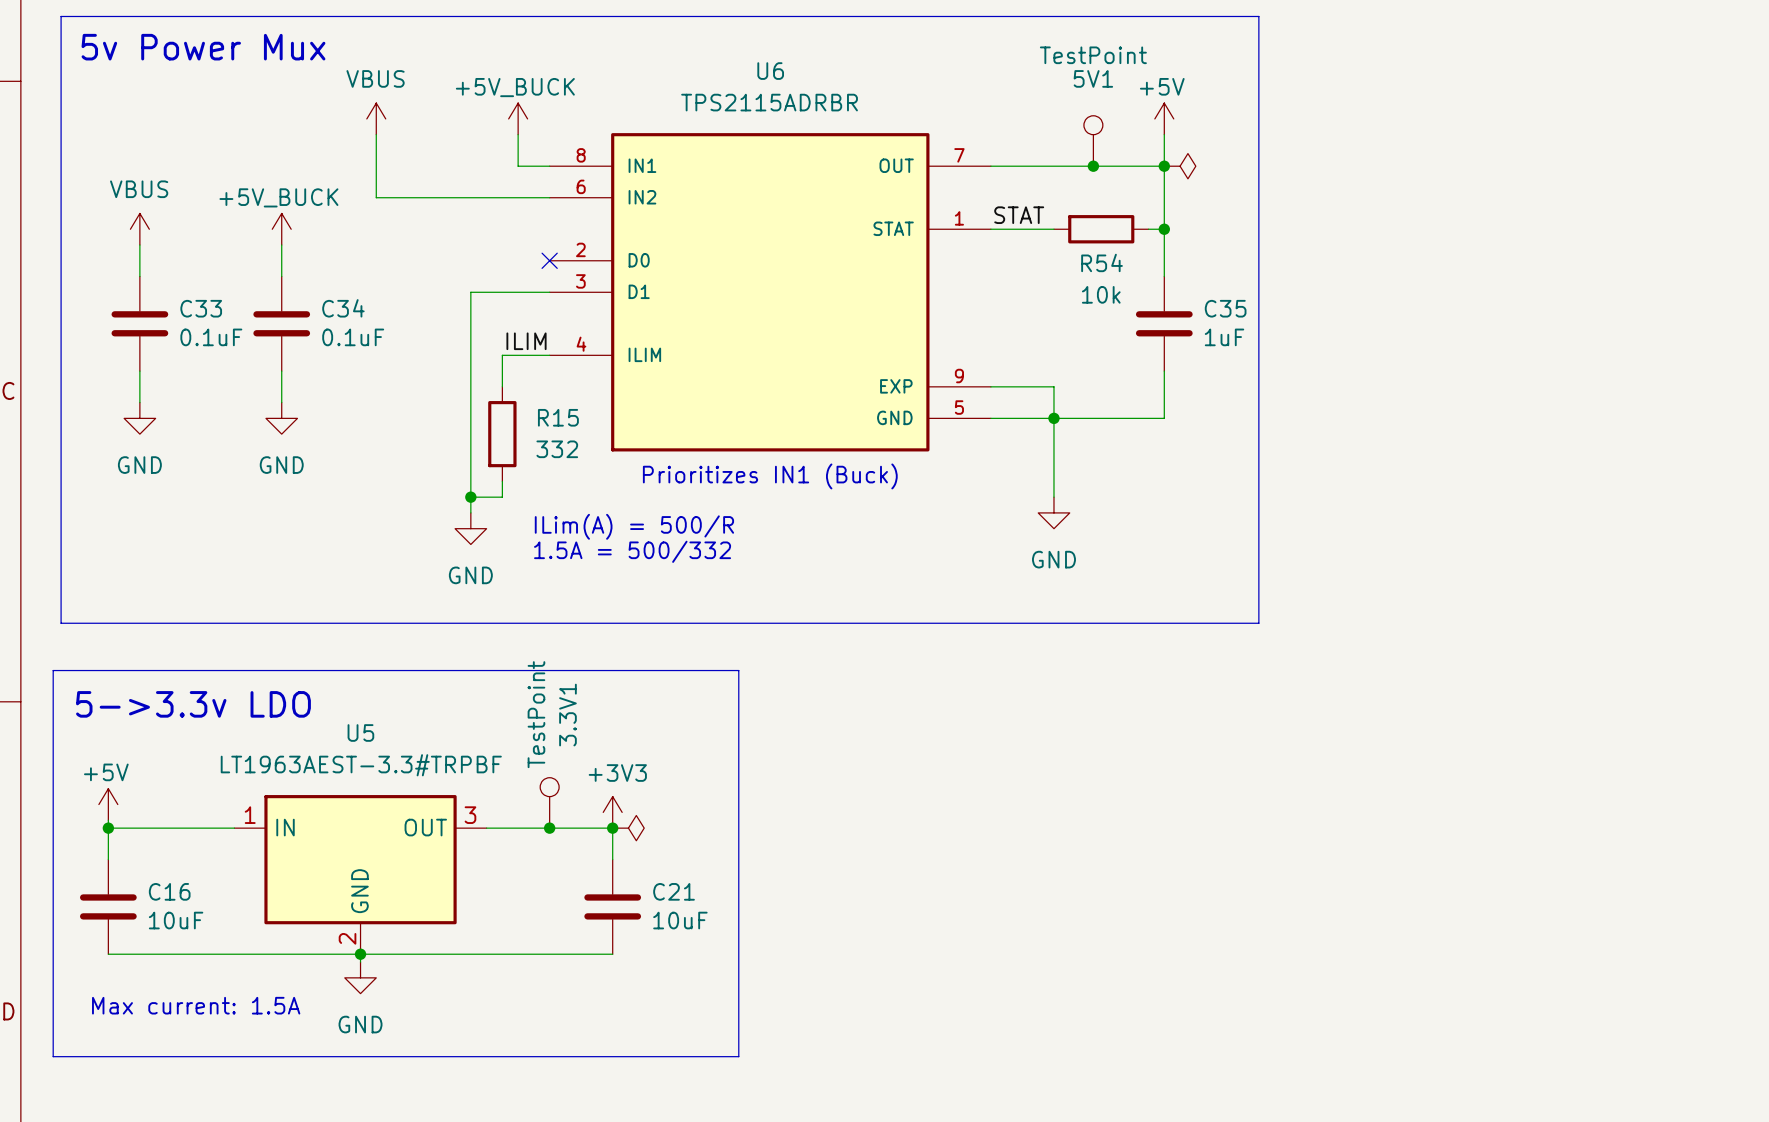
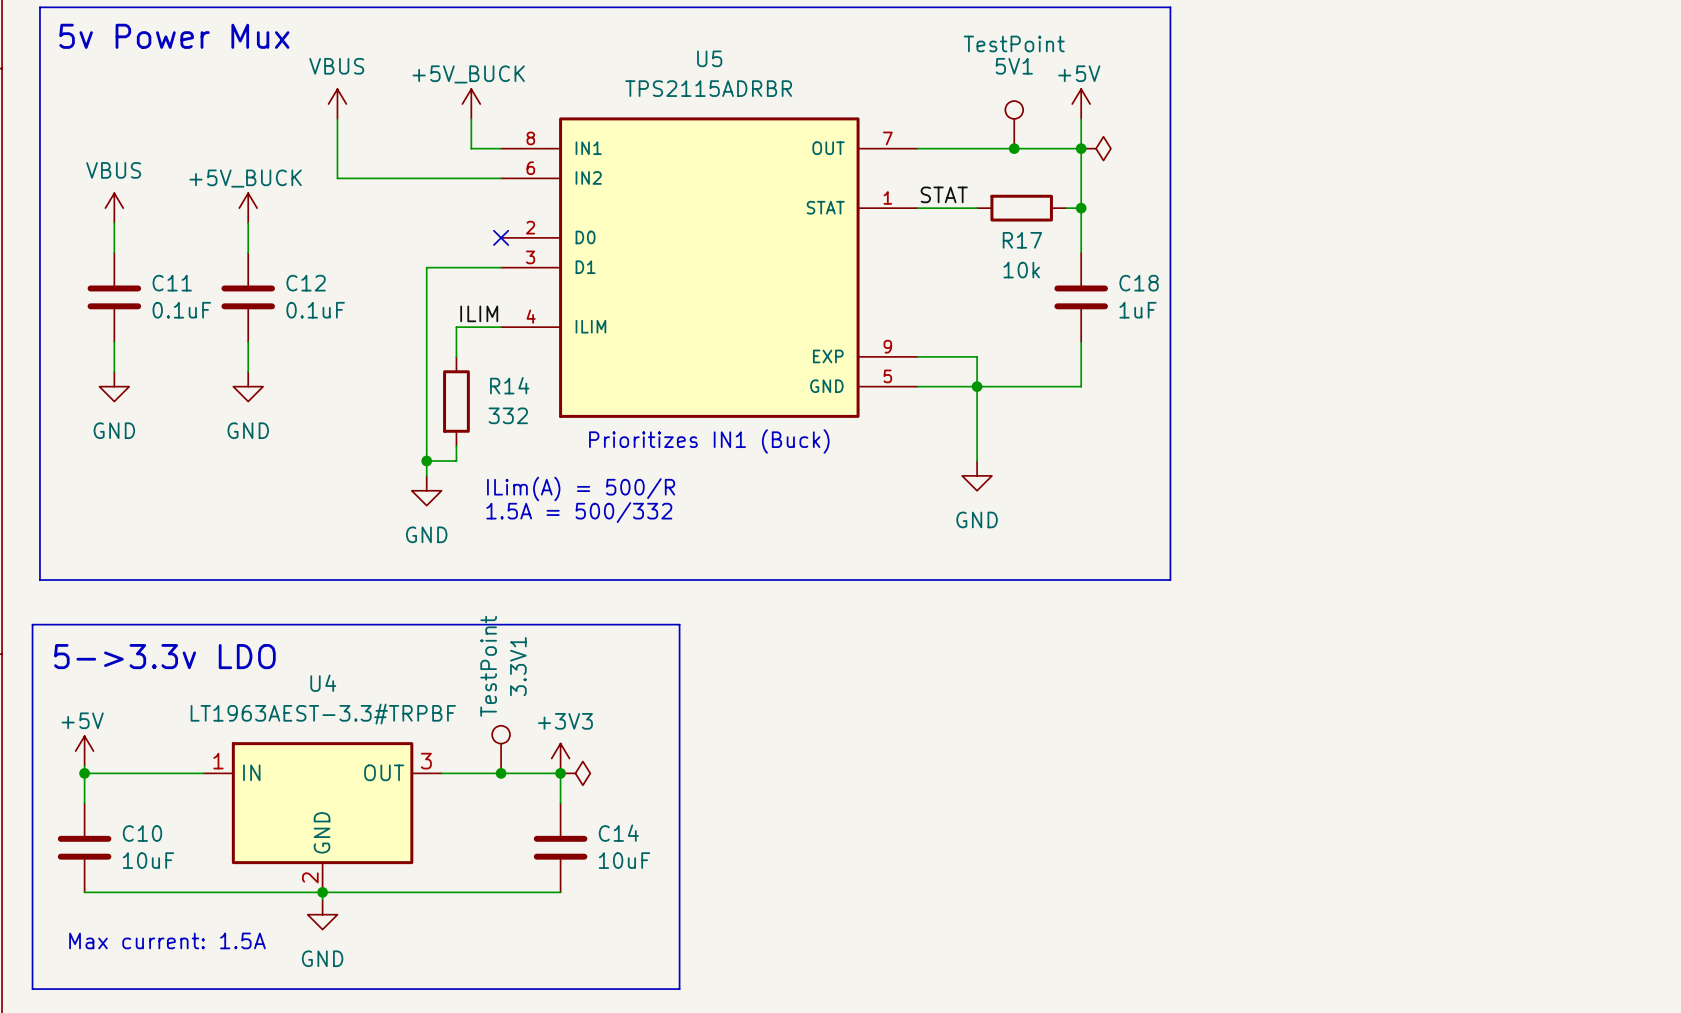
U6 name: U6 (770, 71) -> U5 (709, 58)
R54 name: R54 (1102, 262) -> R17 (1022, 240)
C33 name: C33 (201, 308) -> C11 (172, 283)
C34 name: C34 (343, 308) -> C12 (306, 283)
C35 name: C35 (1225, 308) -> C18 (1139, 283)
R15 name: R15 (558, 417) -> R14 (509, 385)
U5 name: U5 (360, 732) -> U4 (323, 683)
C16 name: C16 (169, 891) -> C10 (142, 833)
C21 name: C21 (674, 891) -> C14 (618, 833)

